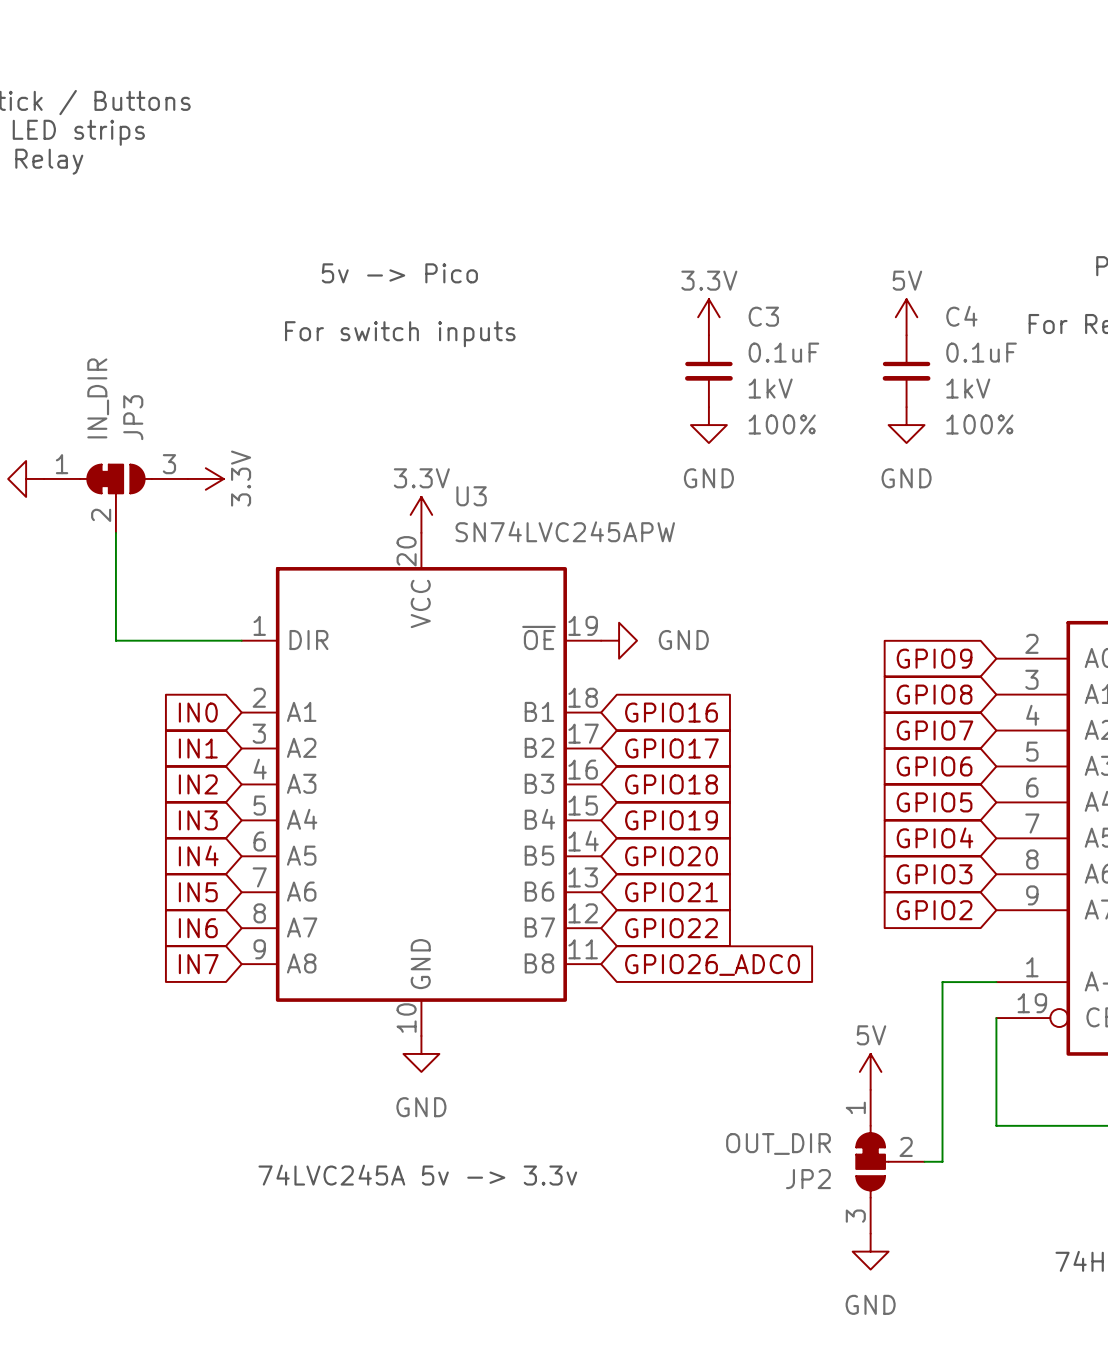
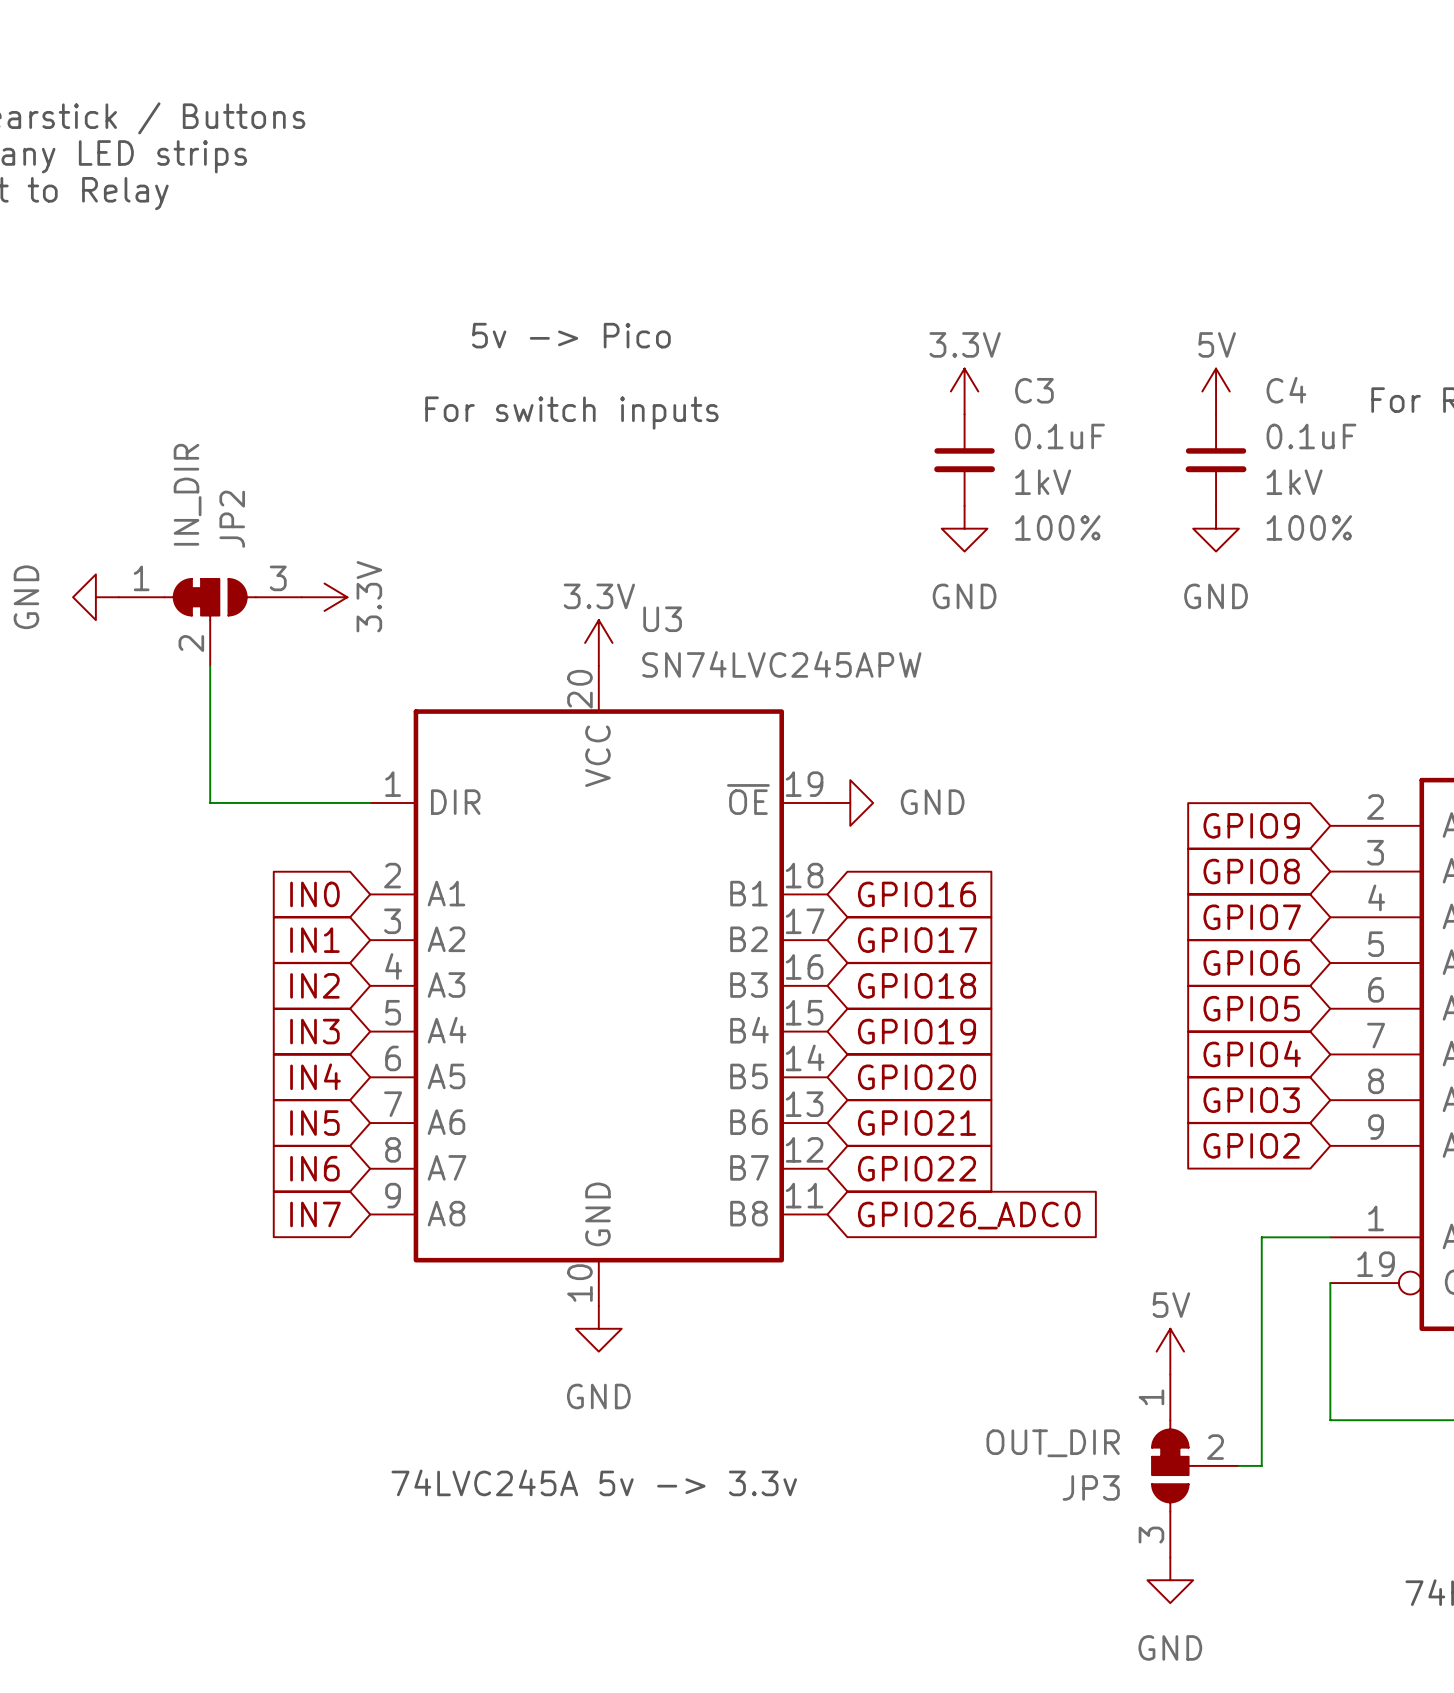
JP3 name: JP3 (133, 417) -> JP2 (232, 519)
JP2 name: JP2 (808, 1179) -> JP3 (1091, 1487)

